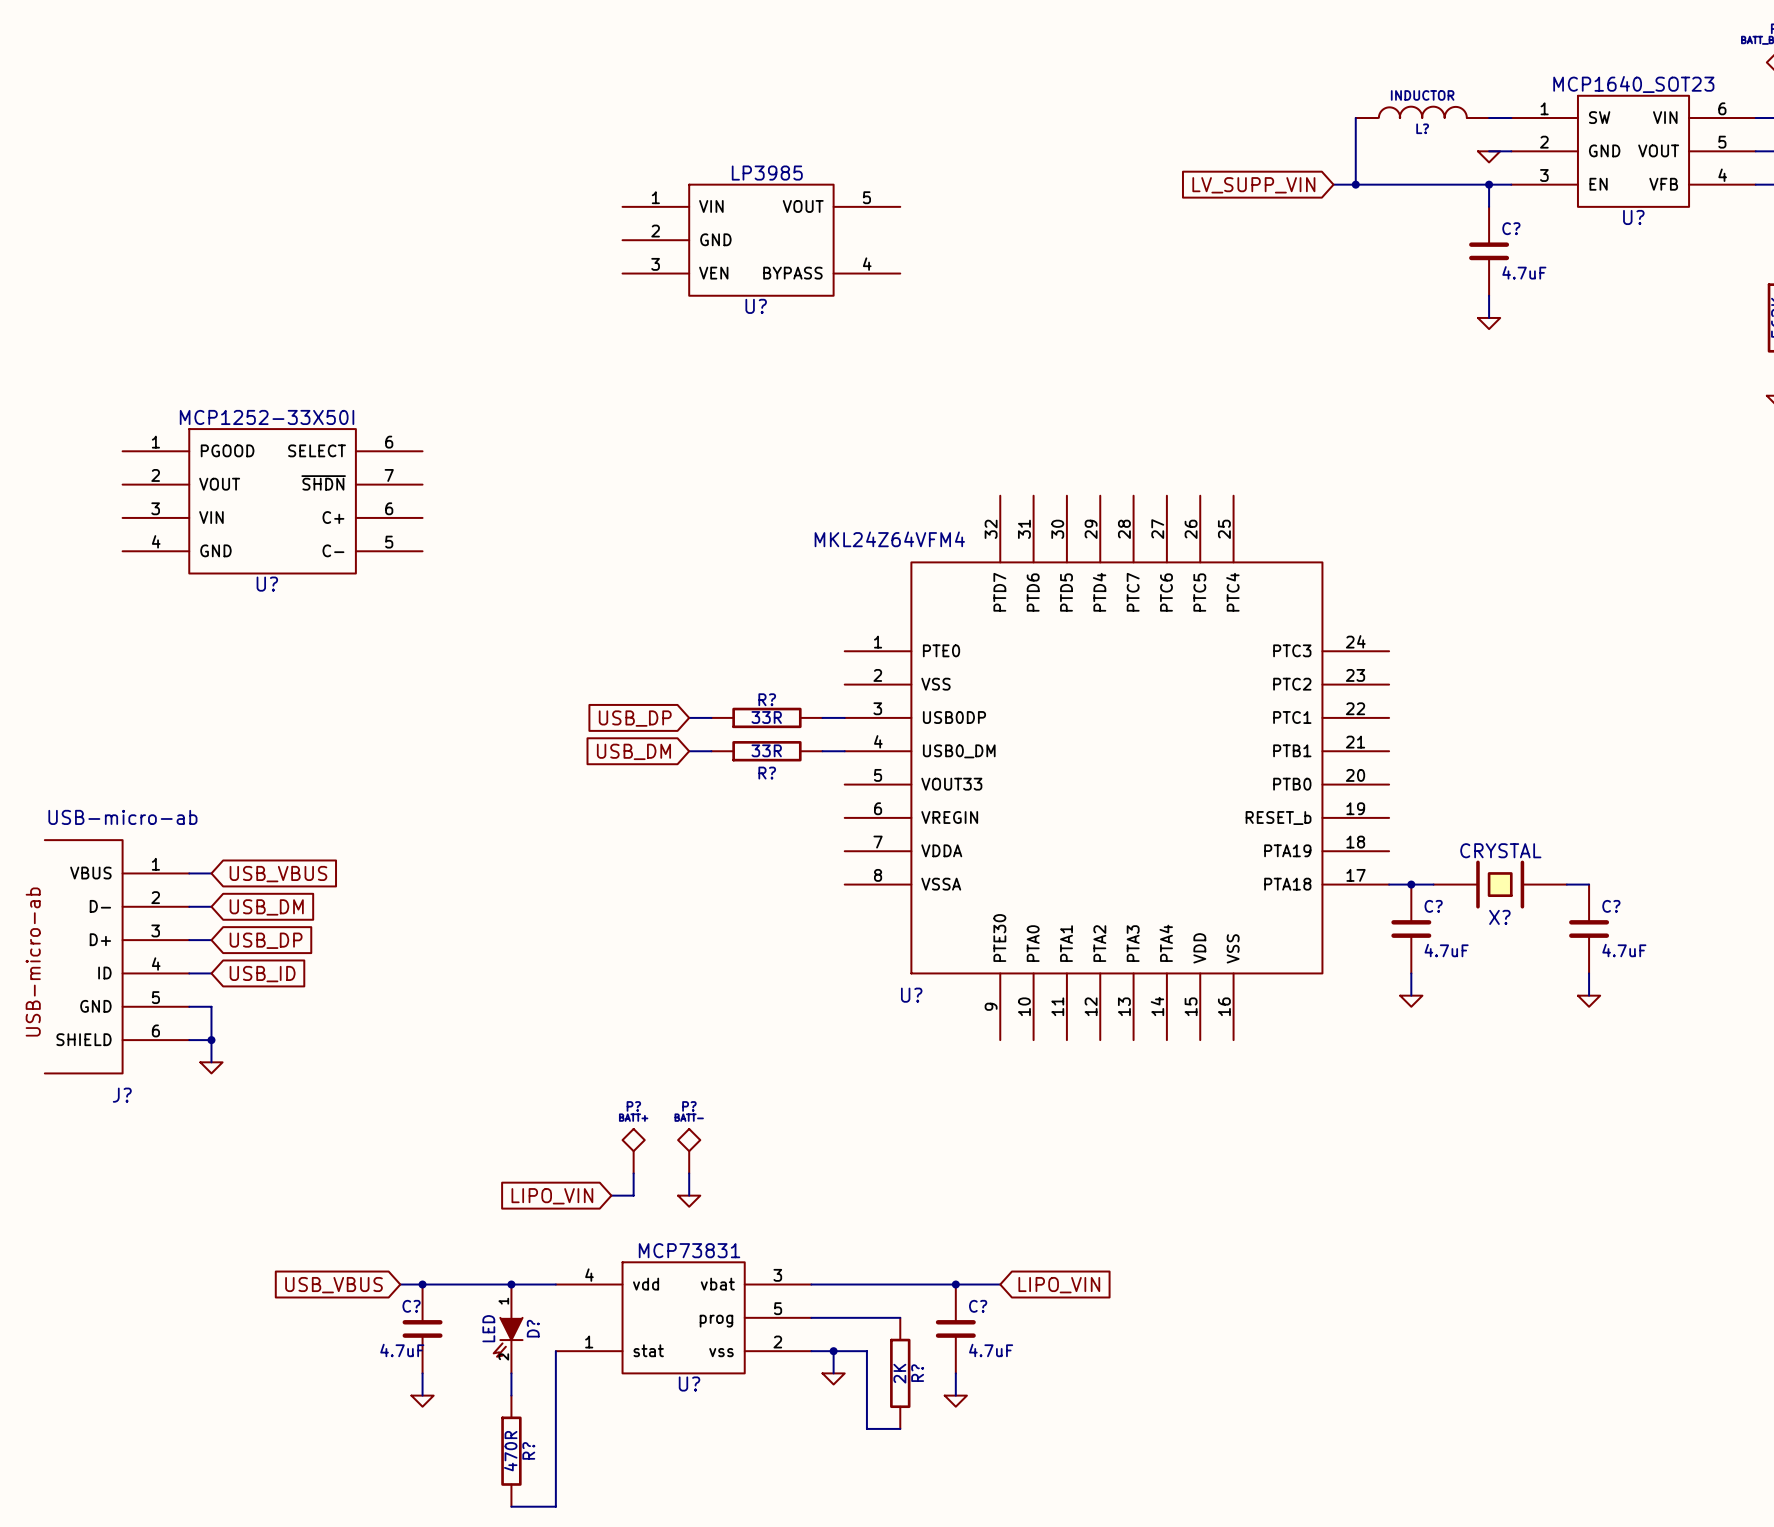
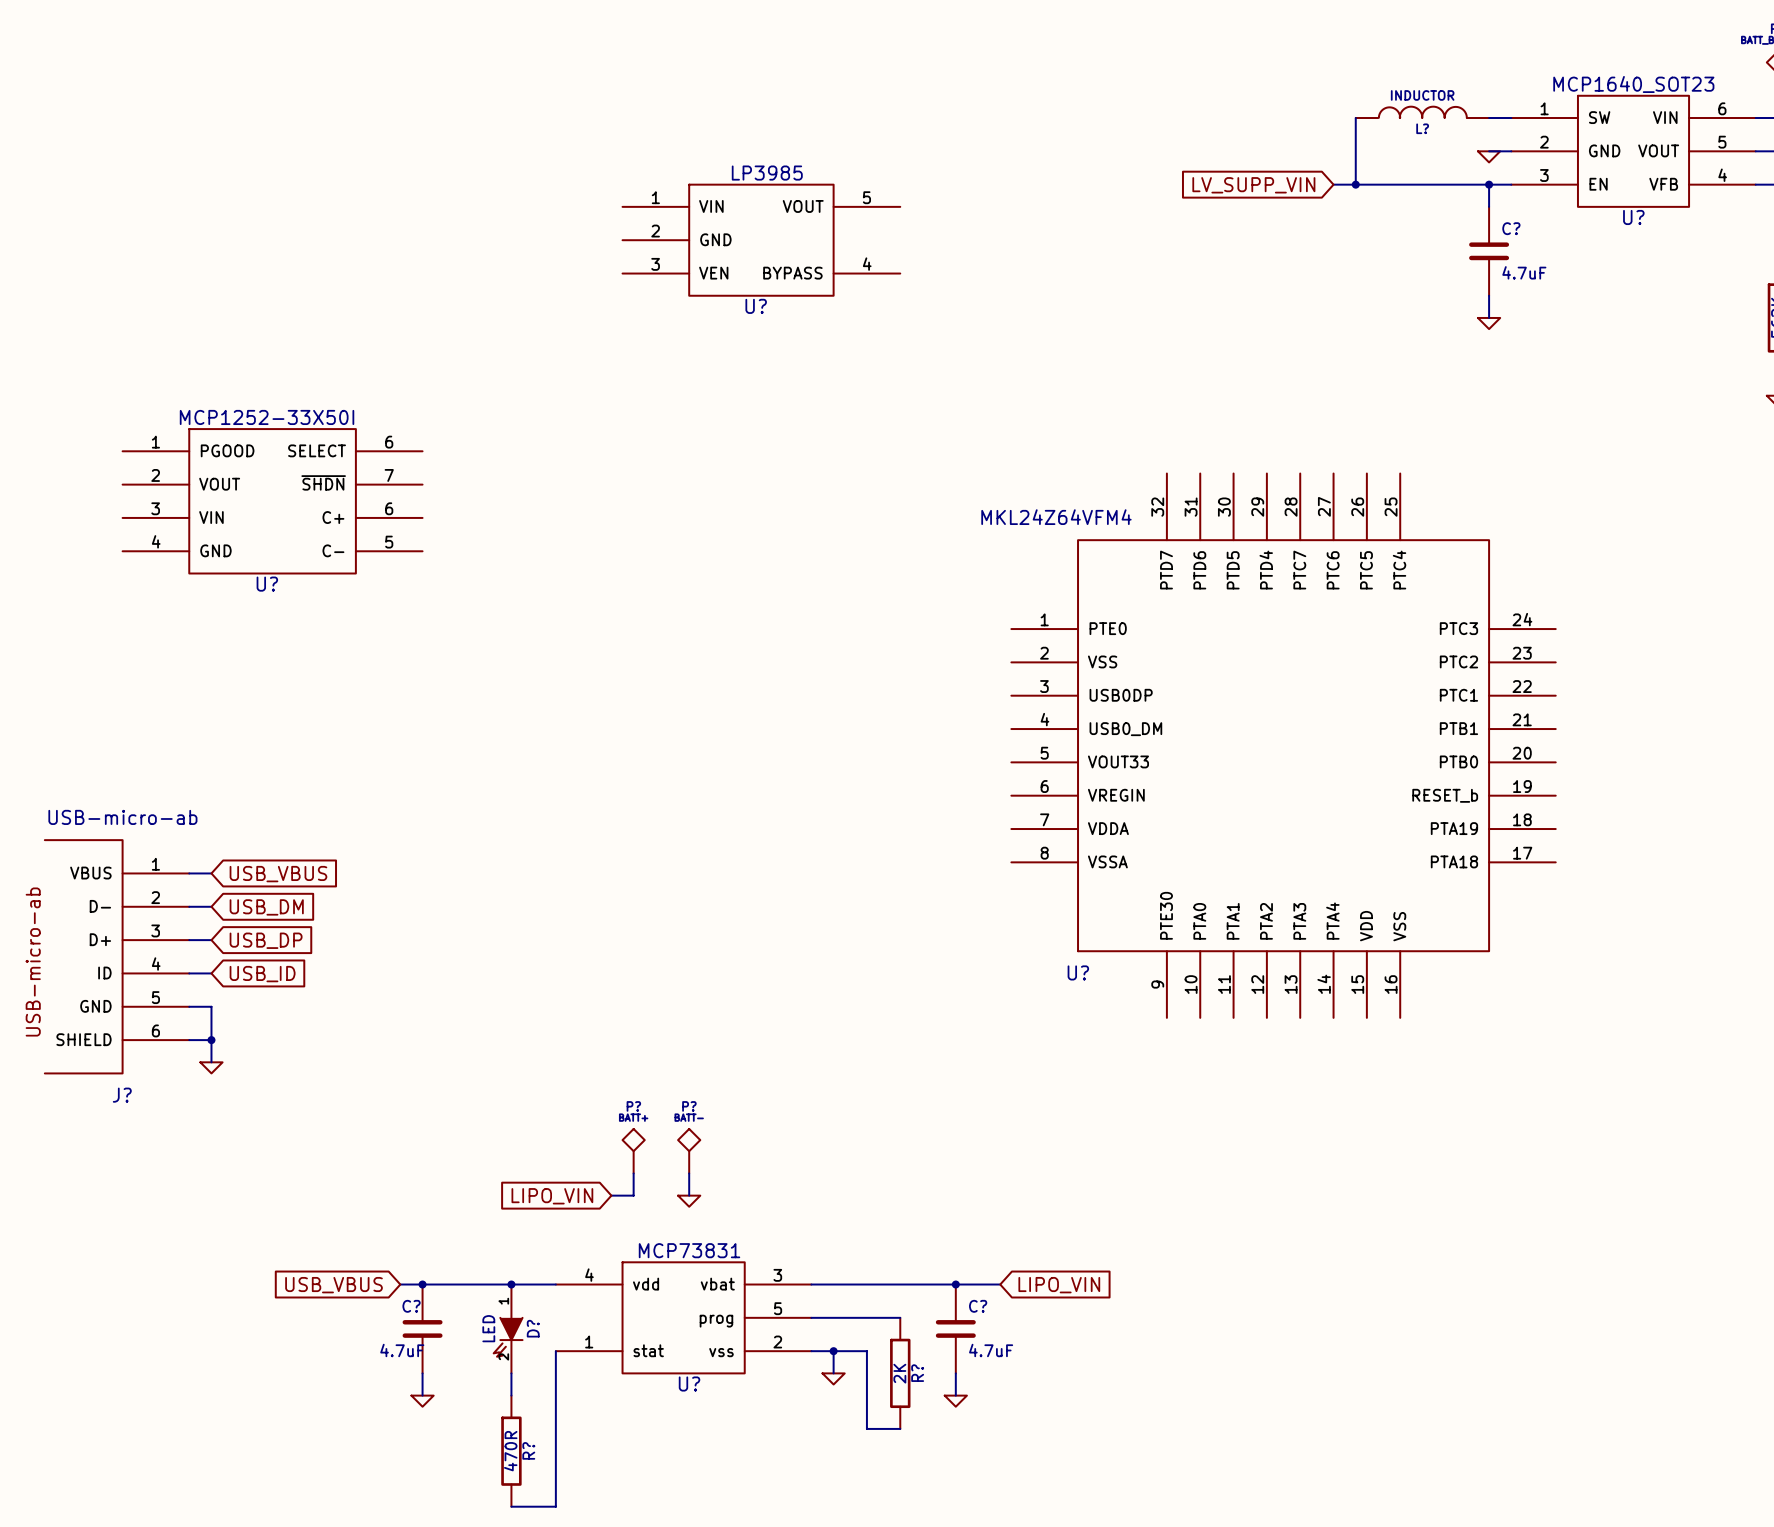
wire: (689, 717) (711, 717) -> none
R?: 33R (766, 717) -> none
wire: (822, 717) (844, 717) -> none
global label: USB_DP (635, 718) -> none
global label: USB_DM (633, 751) -> none
wire: (689, 751) (711, 751) -> none
R?: 33R (766, 751) -> none
wire: (822, 751) (844, 751) -> none
U? position: (1116, 767) -> (1283, 745)
wire: (1389, 884) (1433, 884) -> none
junction: (1411, 884) -> none
X?: CRYSTAL (1500, 884) -> none
wire: (1566, 884) (1589, 884) -> none
C?: 4.7uF (1411, 929) -> none
C?: 4.7uF (1589, 929) -> none
wire: (1411, 973) (1411, 995) -> none
wire: (1589, 973) (1589, 995) -> none
power symbol: (1411, 1001) -> none
power symbol: (1589, 1001) -> none

